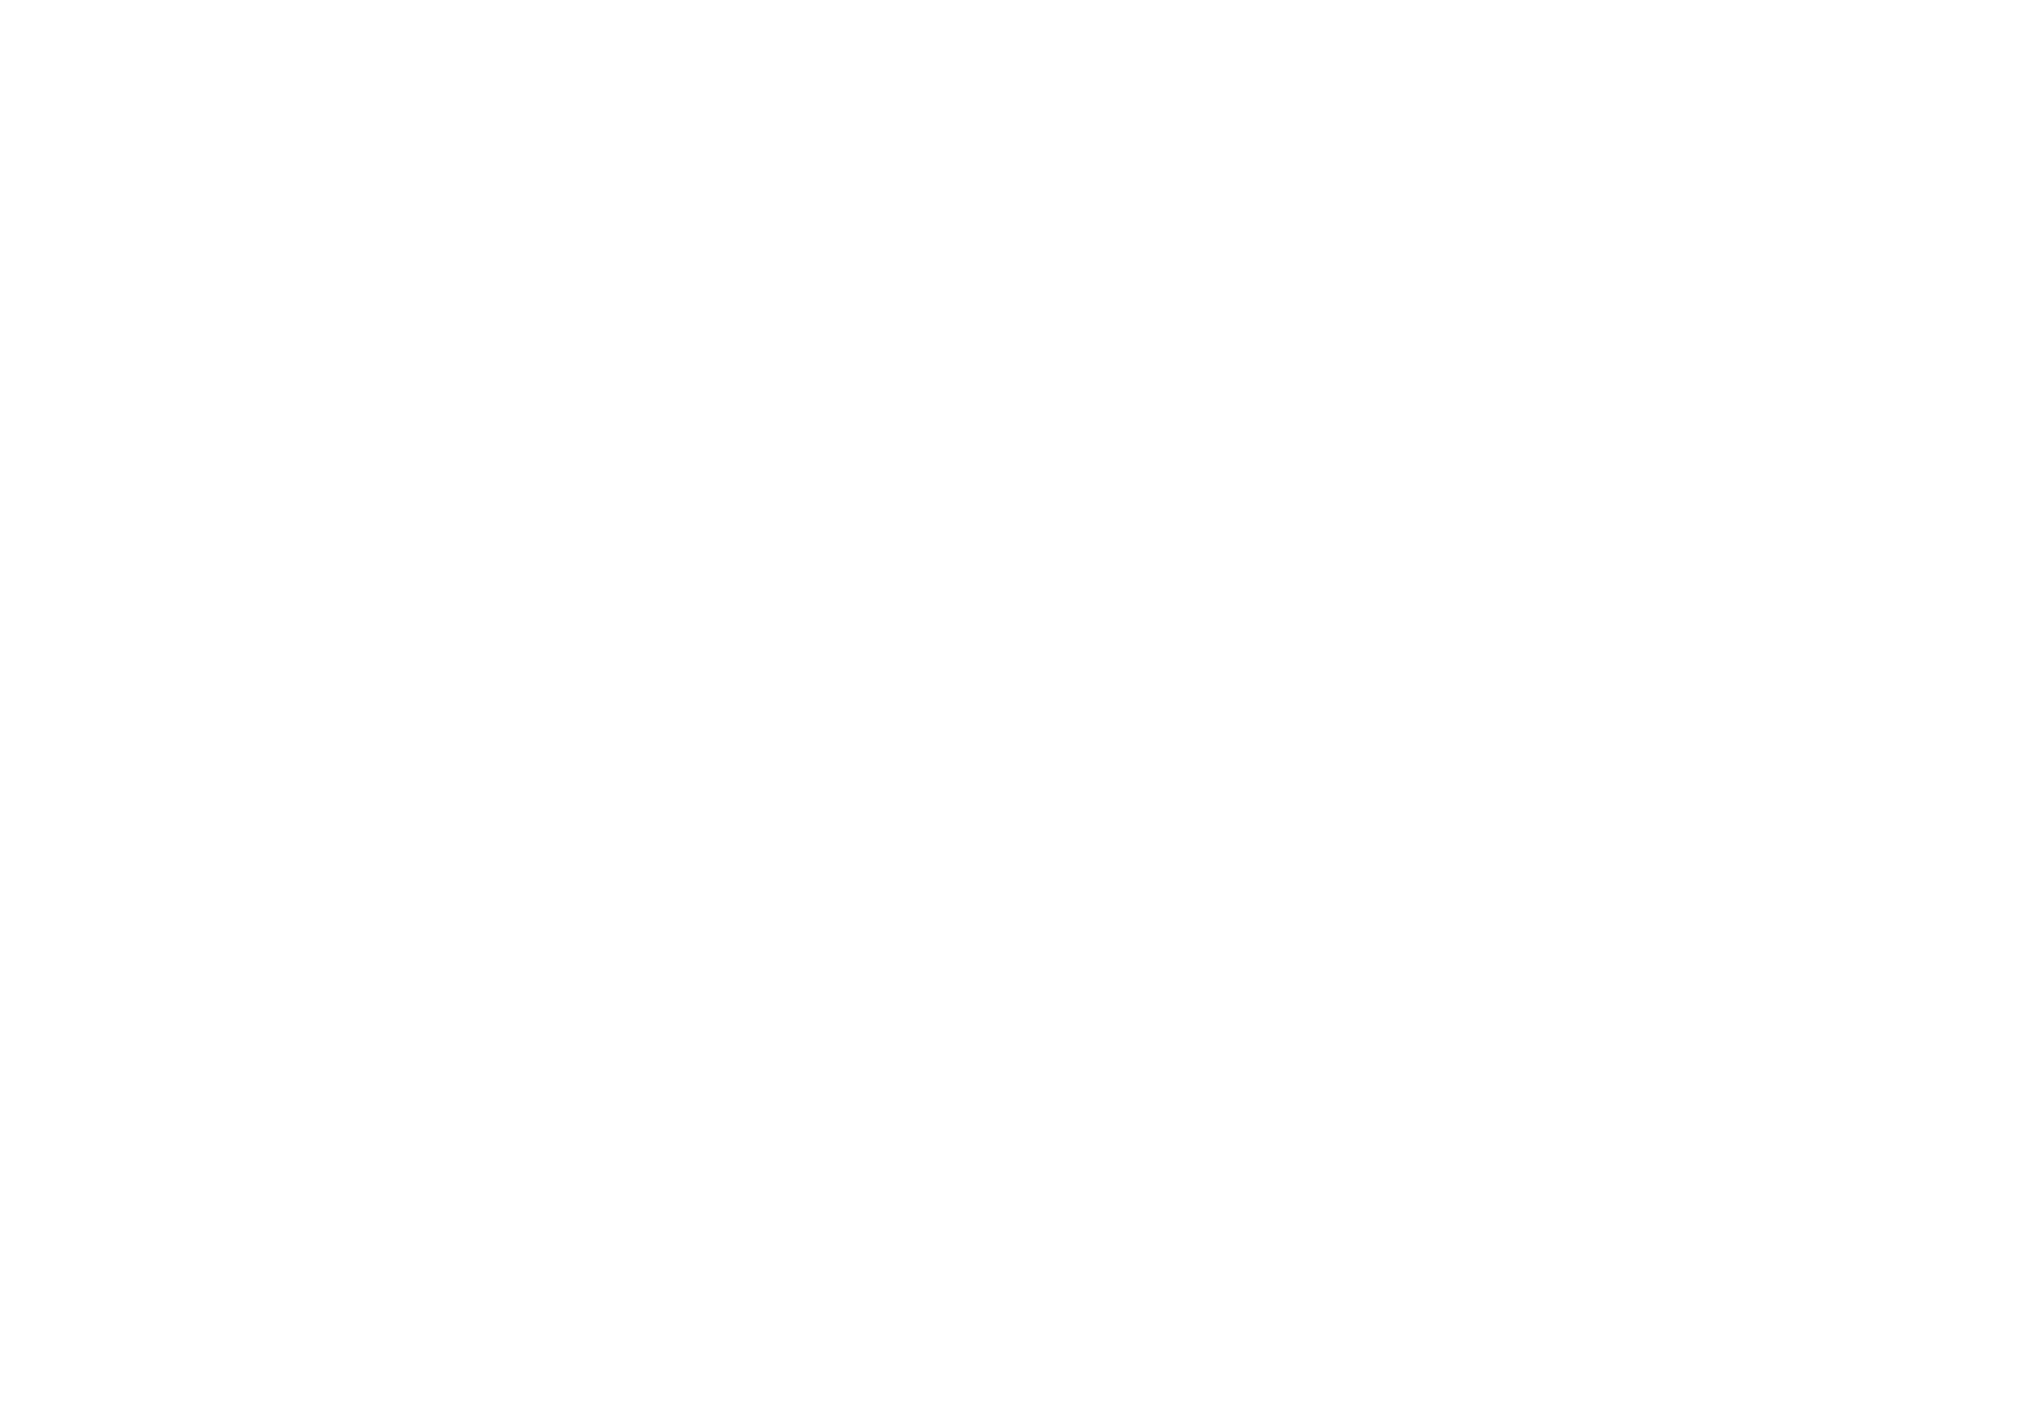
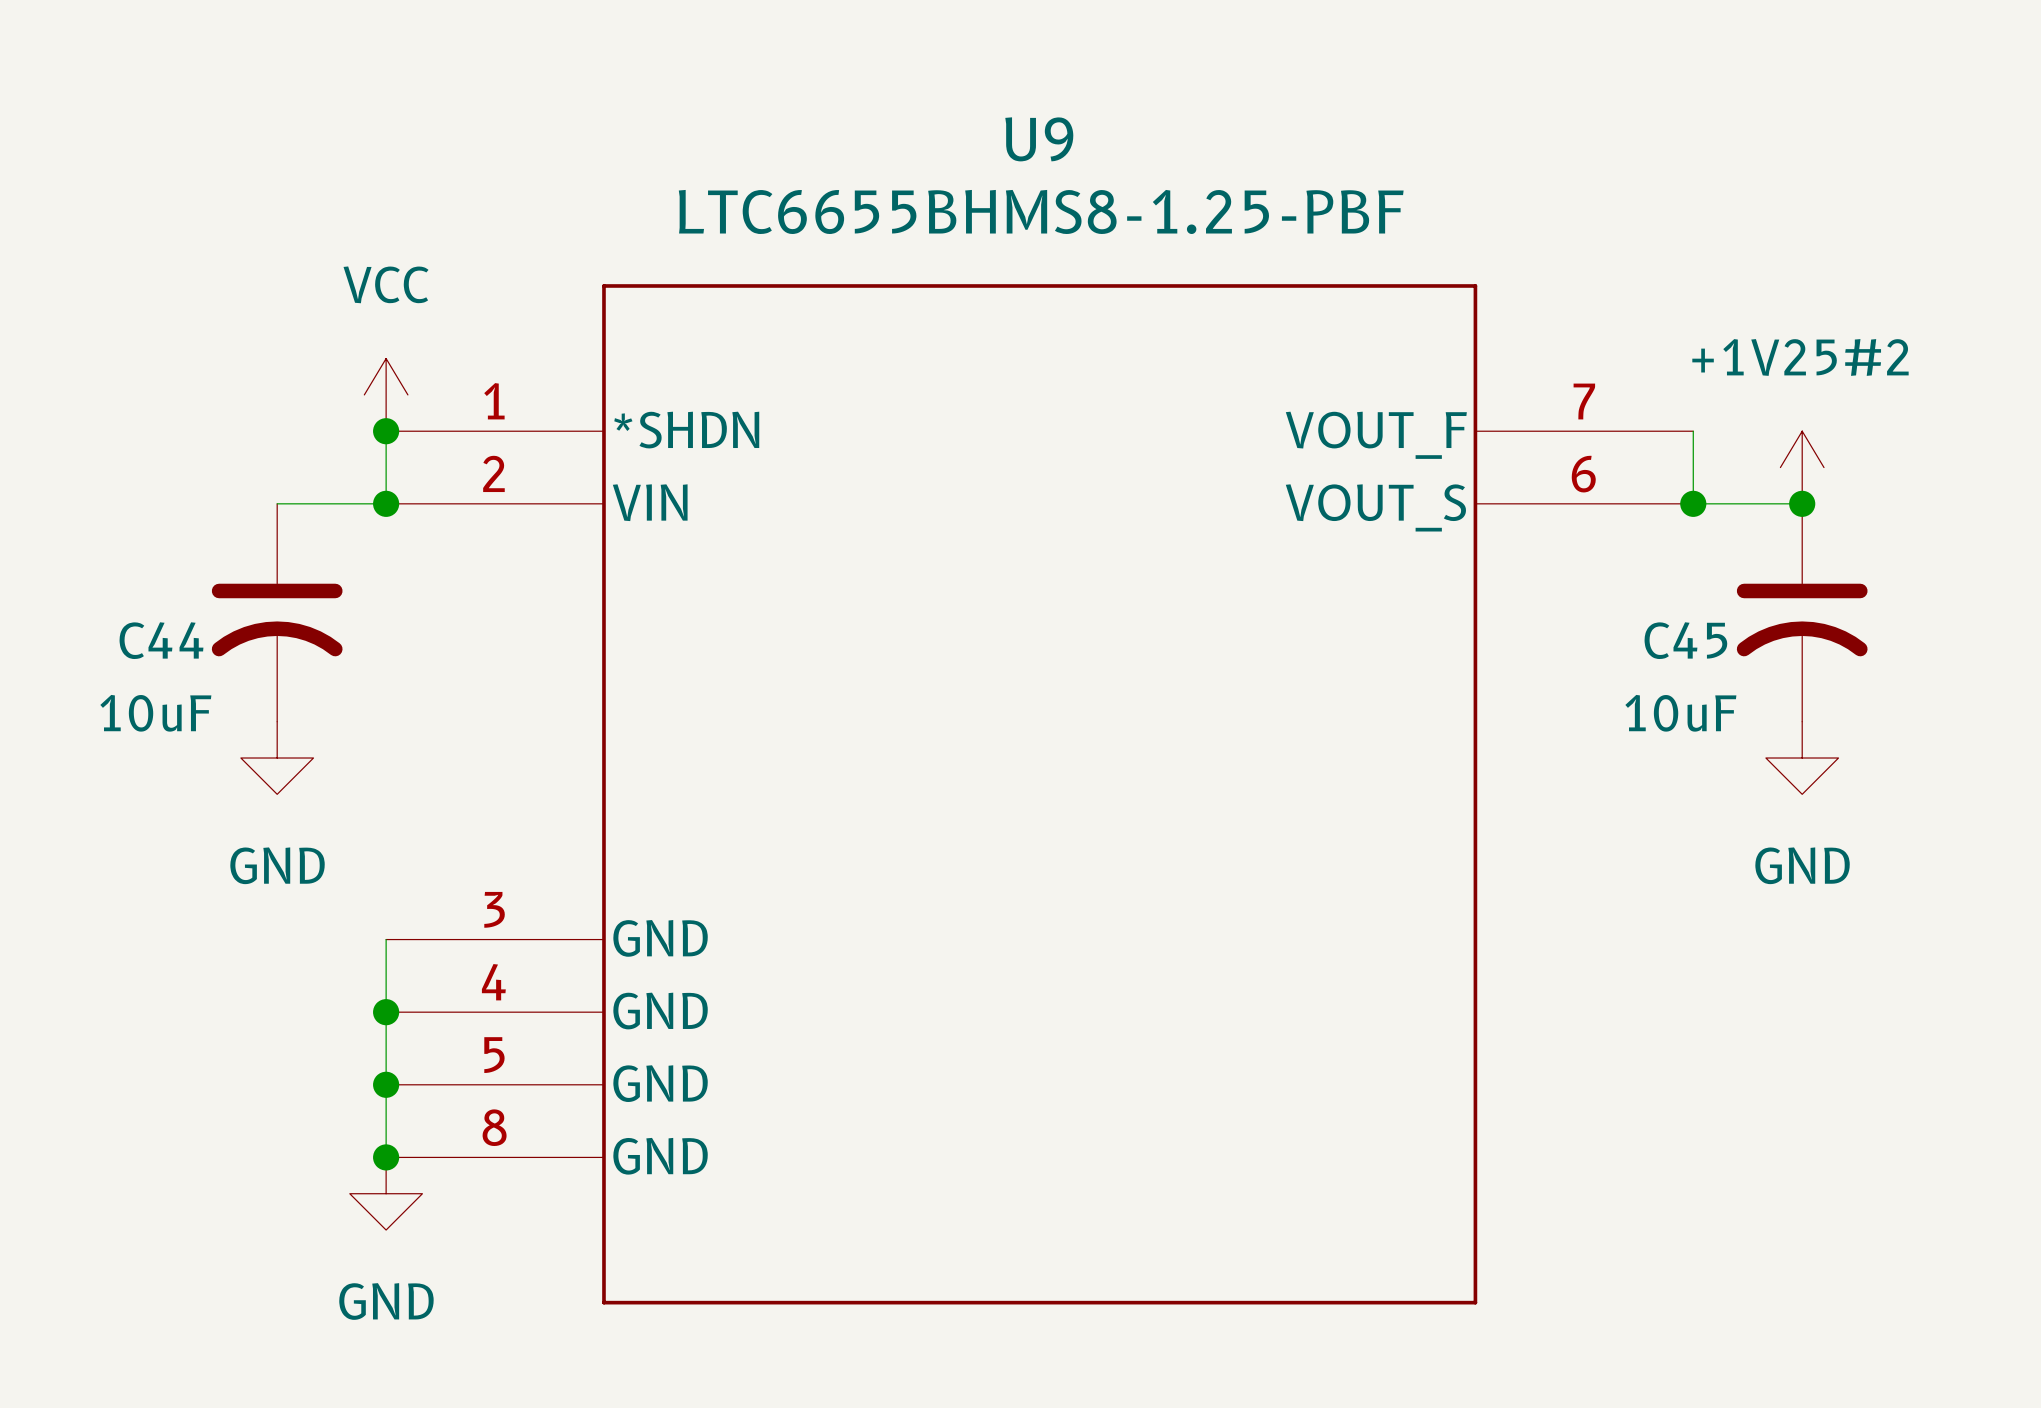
power symbol: none -> VCC (386, 394)
wire: none -> (386, 431) (386, 503) (277, 503)
junction: none -> (386, 431)
wire: none -> (1693, 431) (1693, 503) (1802, 503)
power symbol: none -> +1V25#2 (1802, 467)
junction: none -> (386, 503)
junction: none -> (1693, 503)
junction: none -> (1802, 503)
C44: none -> 10uF (277, 612)
C45: none -> 10uF (1802, 612)
power symbol: none -> GND (277, 758)
power symbol: none -> GND (1802, 758)
U9: none -> LTC6655BHMS8-1.25-PBF (1039, 794)
wire: none -> (386, 939) (386, 1157)
junction: none -> (386, 1012)
junction: none -> (386, 1084)
junction: none -> (386, 1157)
power symbol: none -> GND (386, 1193)

